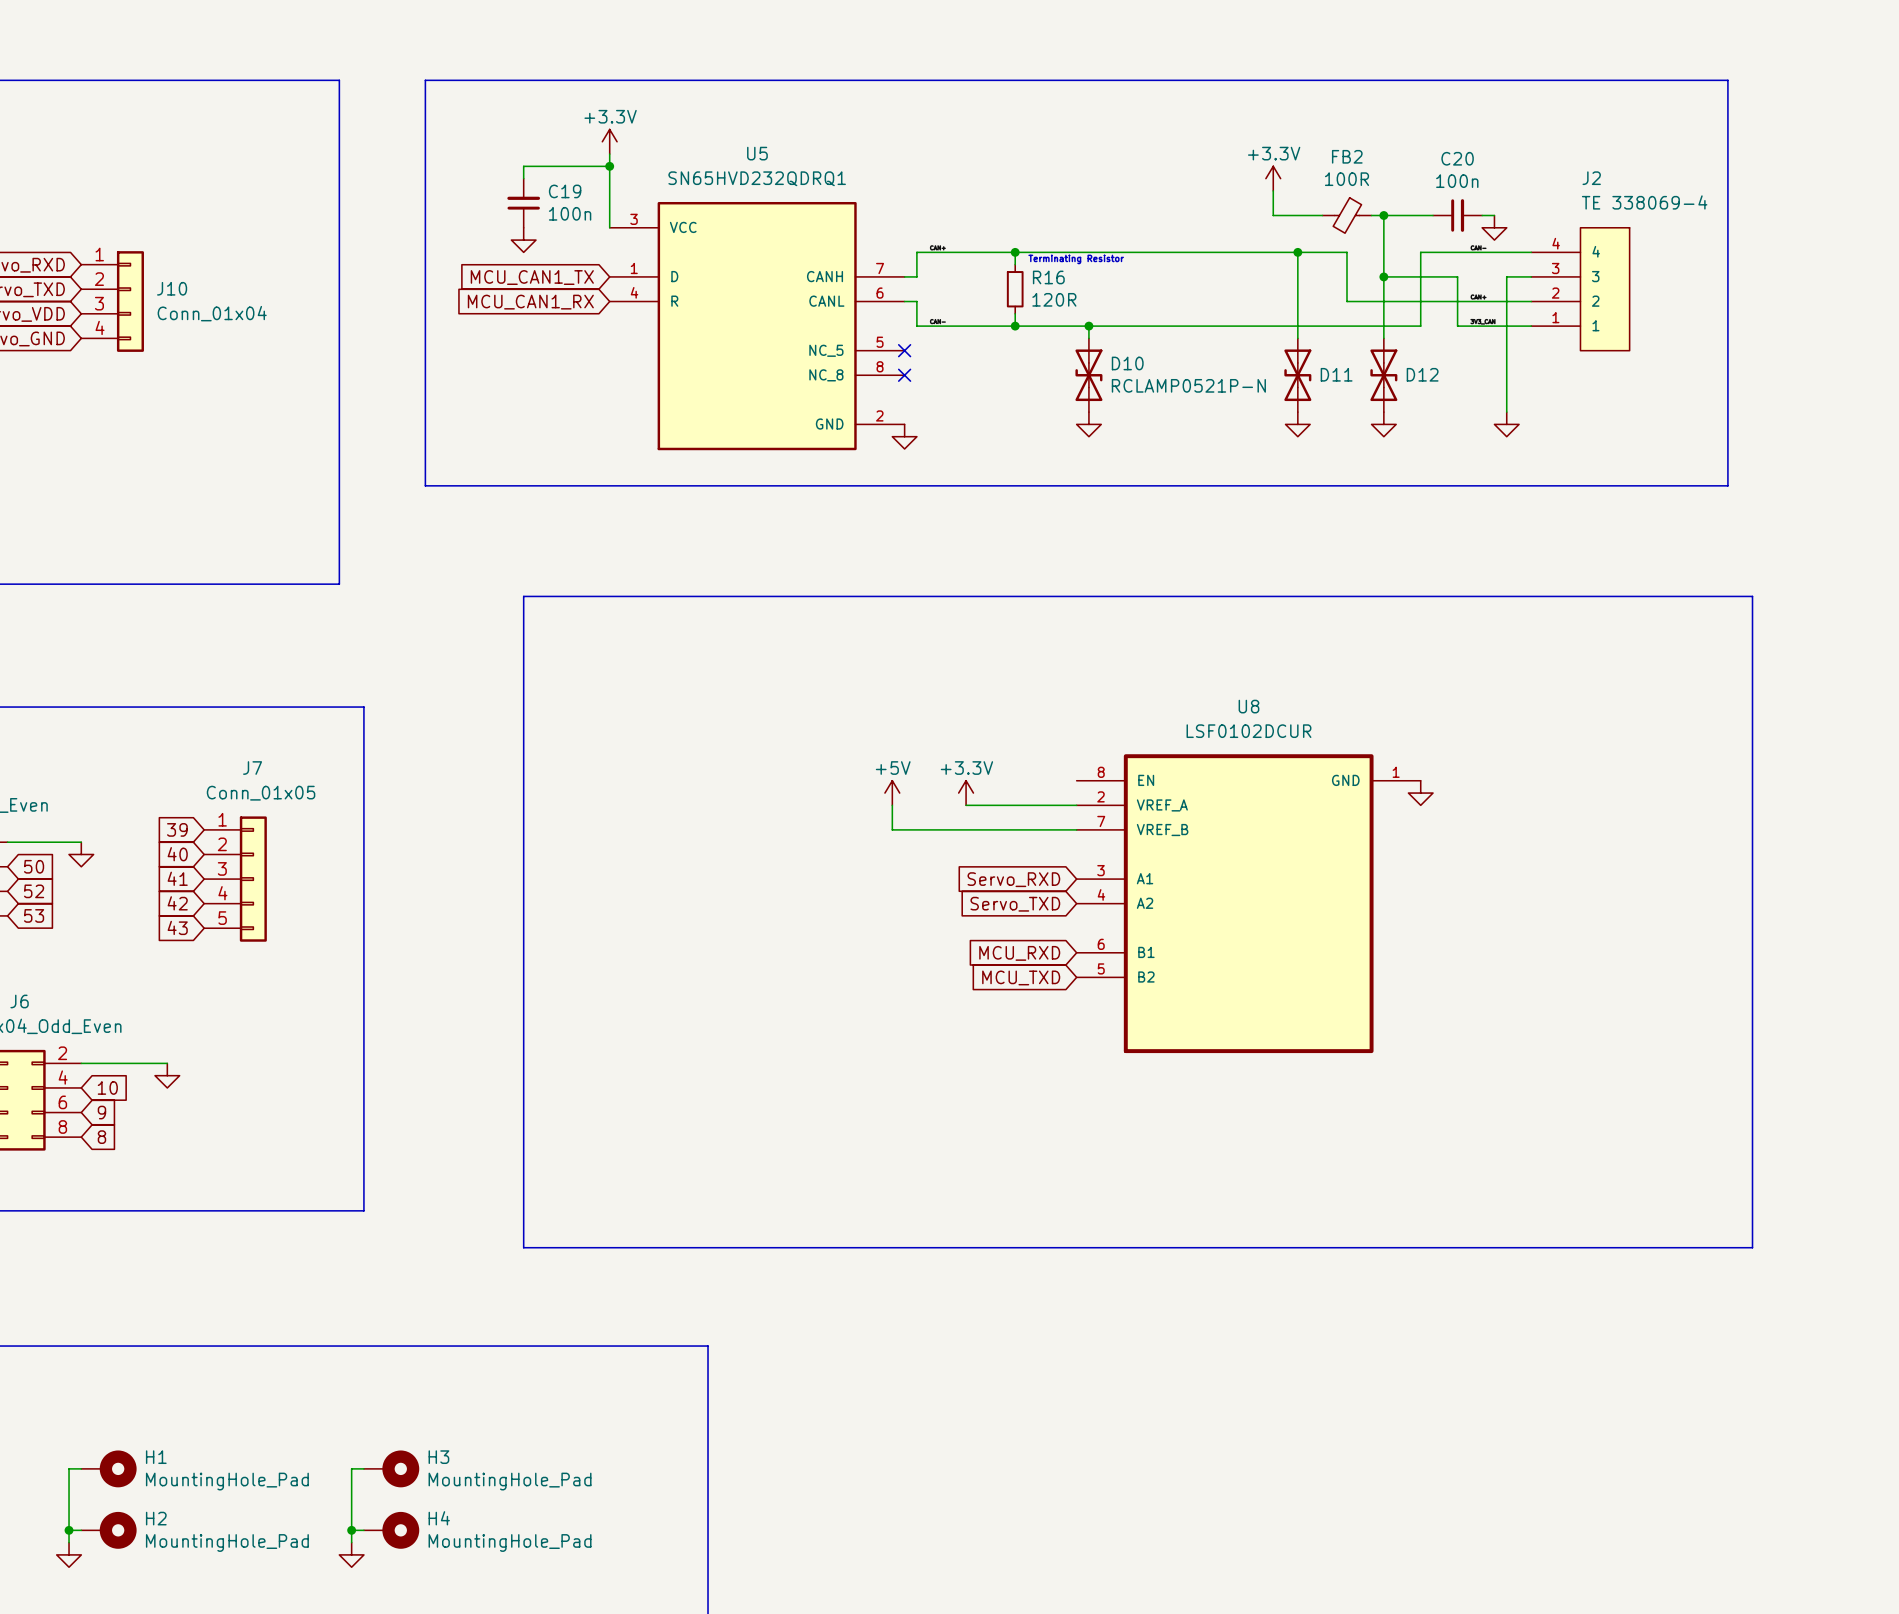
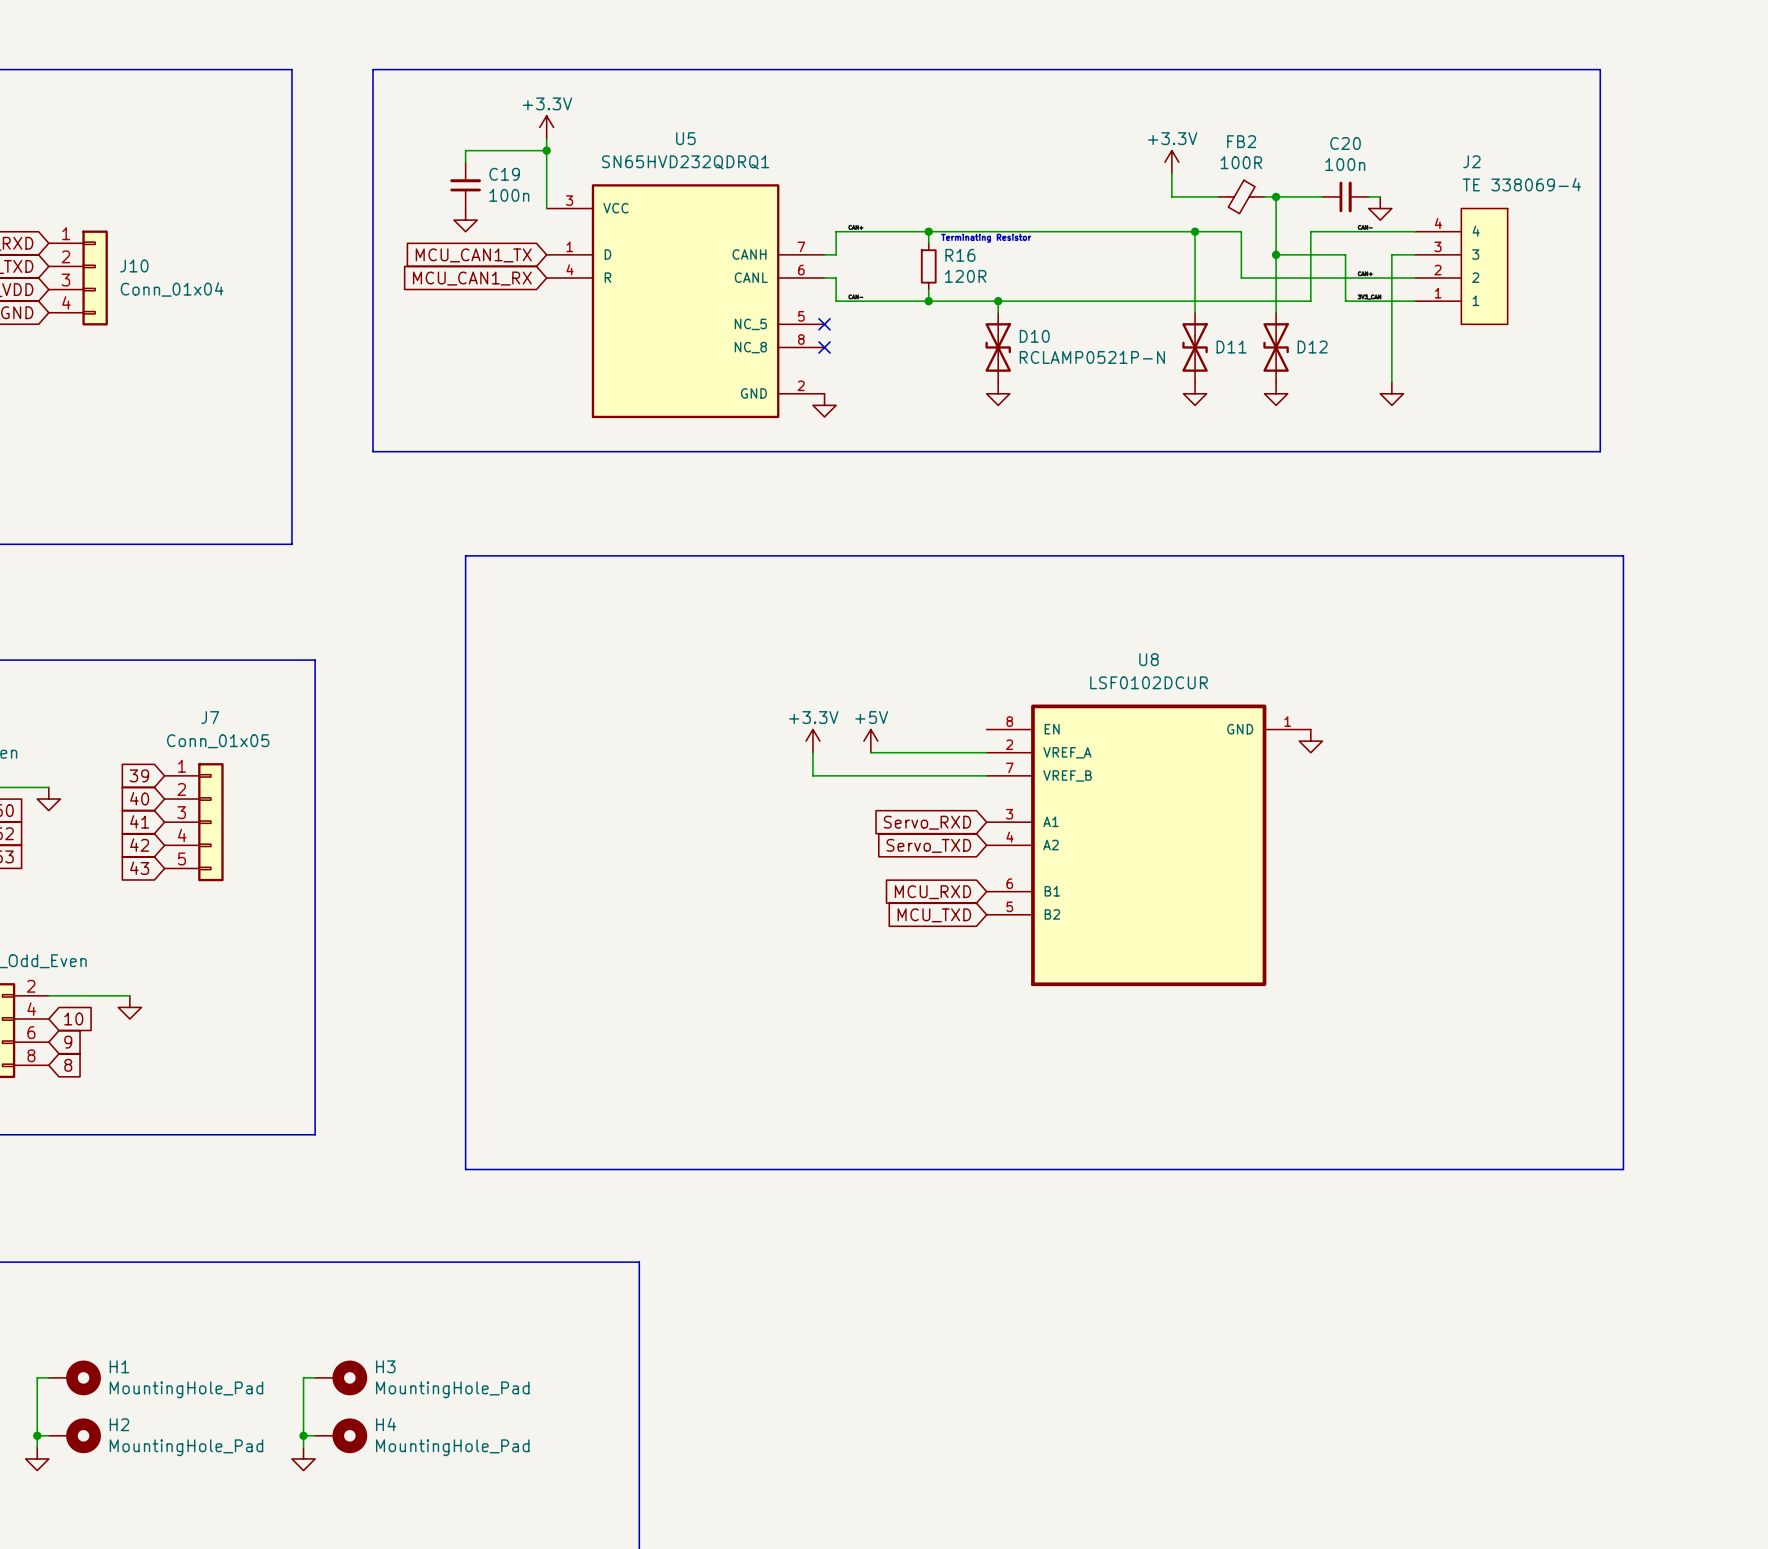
power symbol: +5V (892, 793) -> +3.3V (812, 741)
power symbol: none -> +5V (870, 741)
power symbol: +3.3V (966, 793) -> none
wire: none -> (870, 752) (882, 752)

